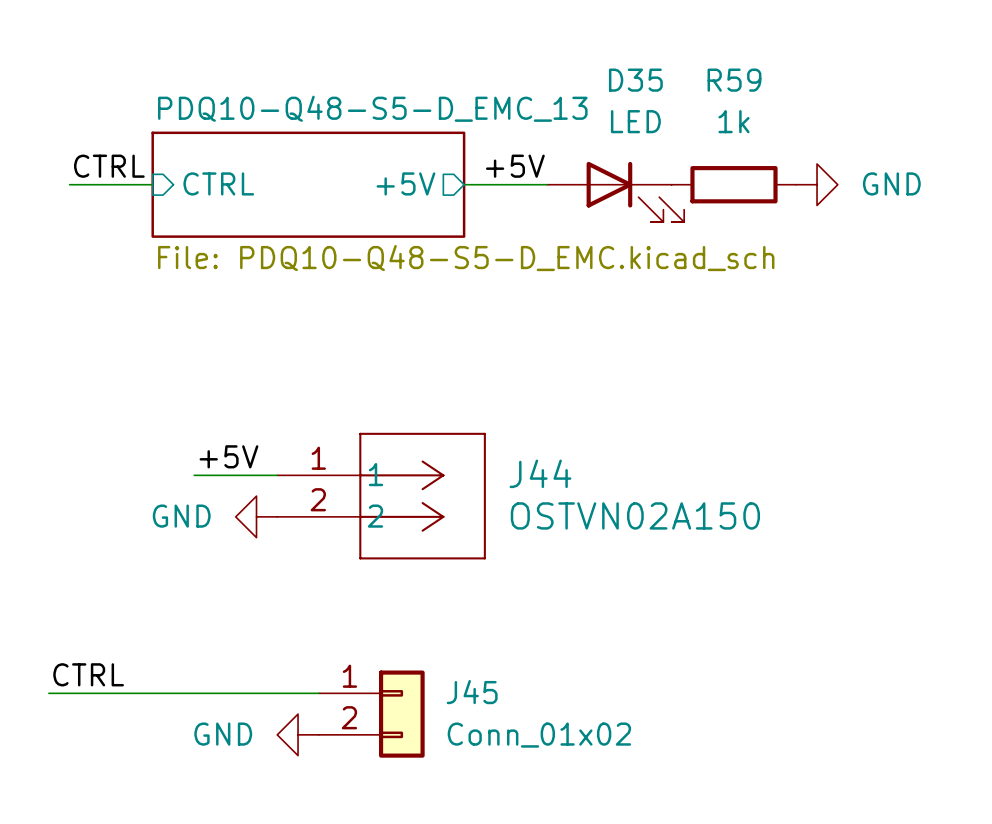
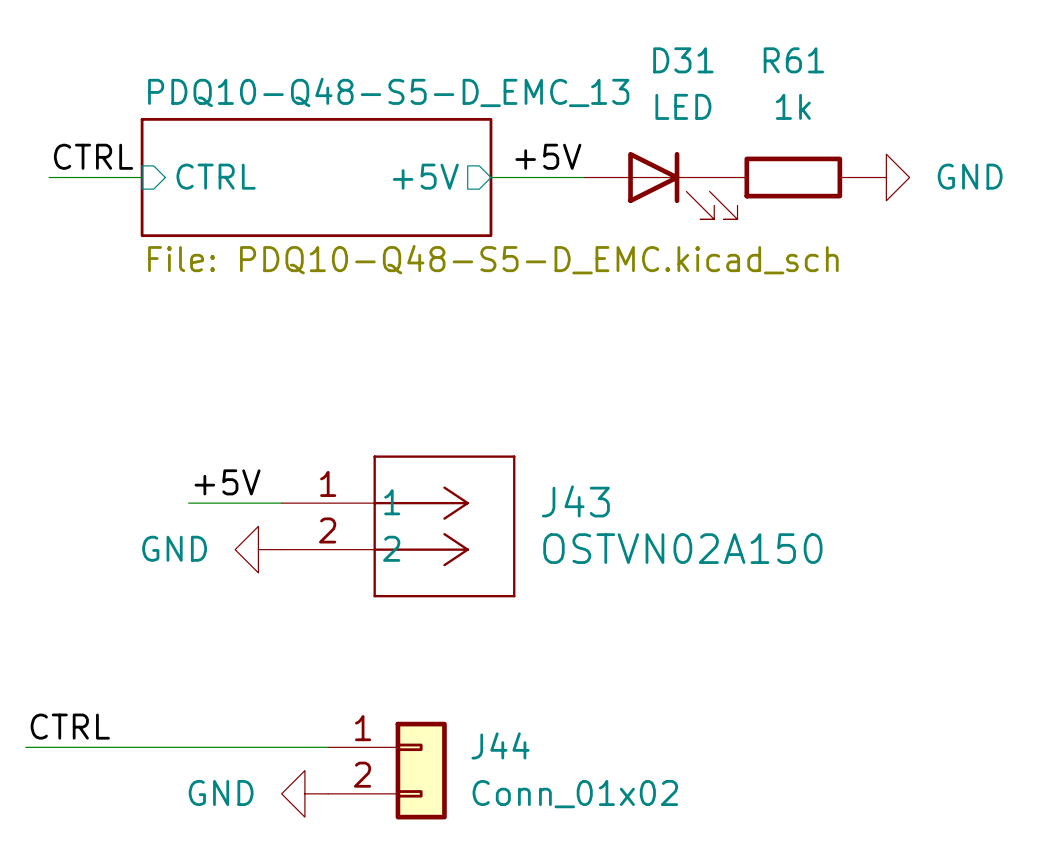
D35 name: D35 (635, 80) -> D31 (683, 60)
R59 name: R59 (734, 80) -> R61 (793, 60)
J44 name: J44 (540, 473) -> J43 (575, 501)
J45 name: J45 (472, 692) -> J44 (500, 745)

